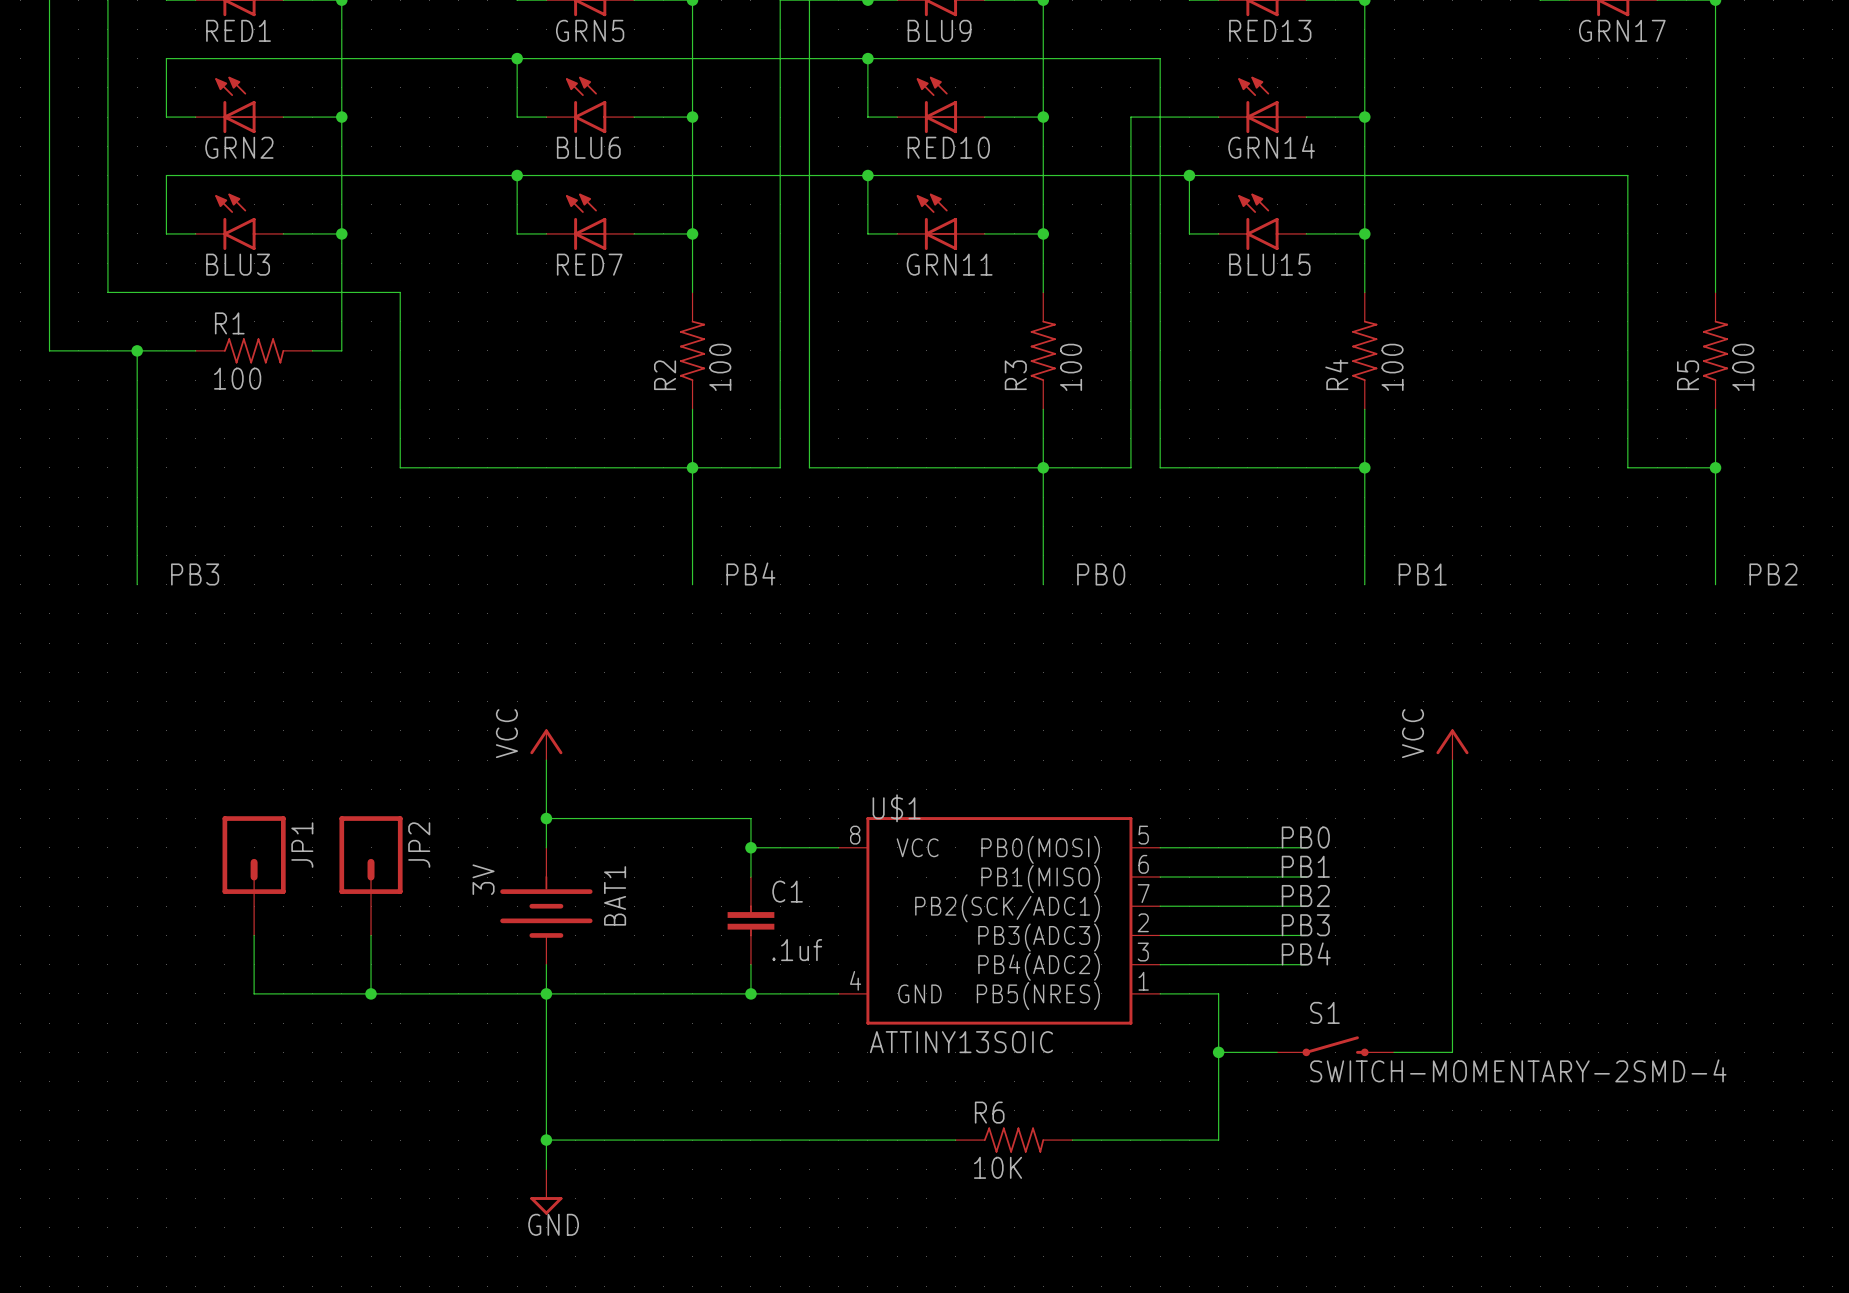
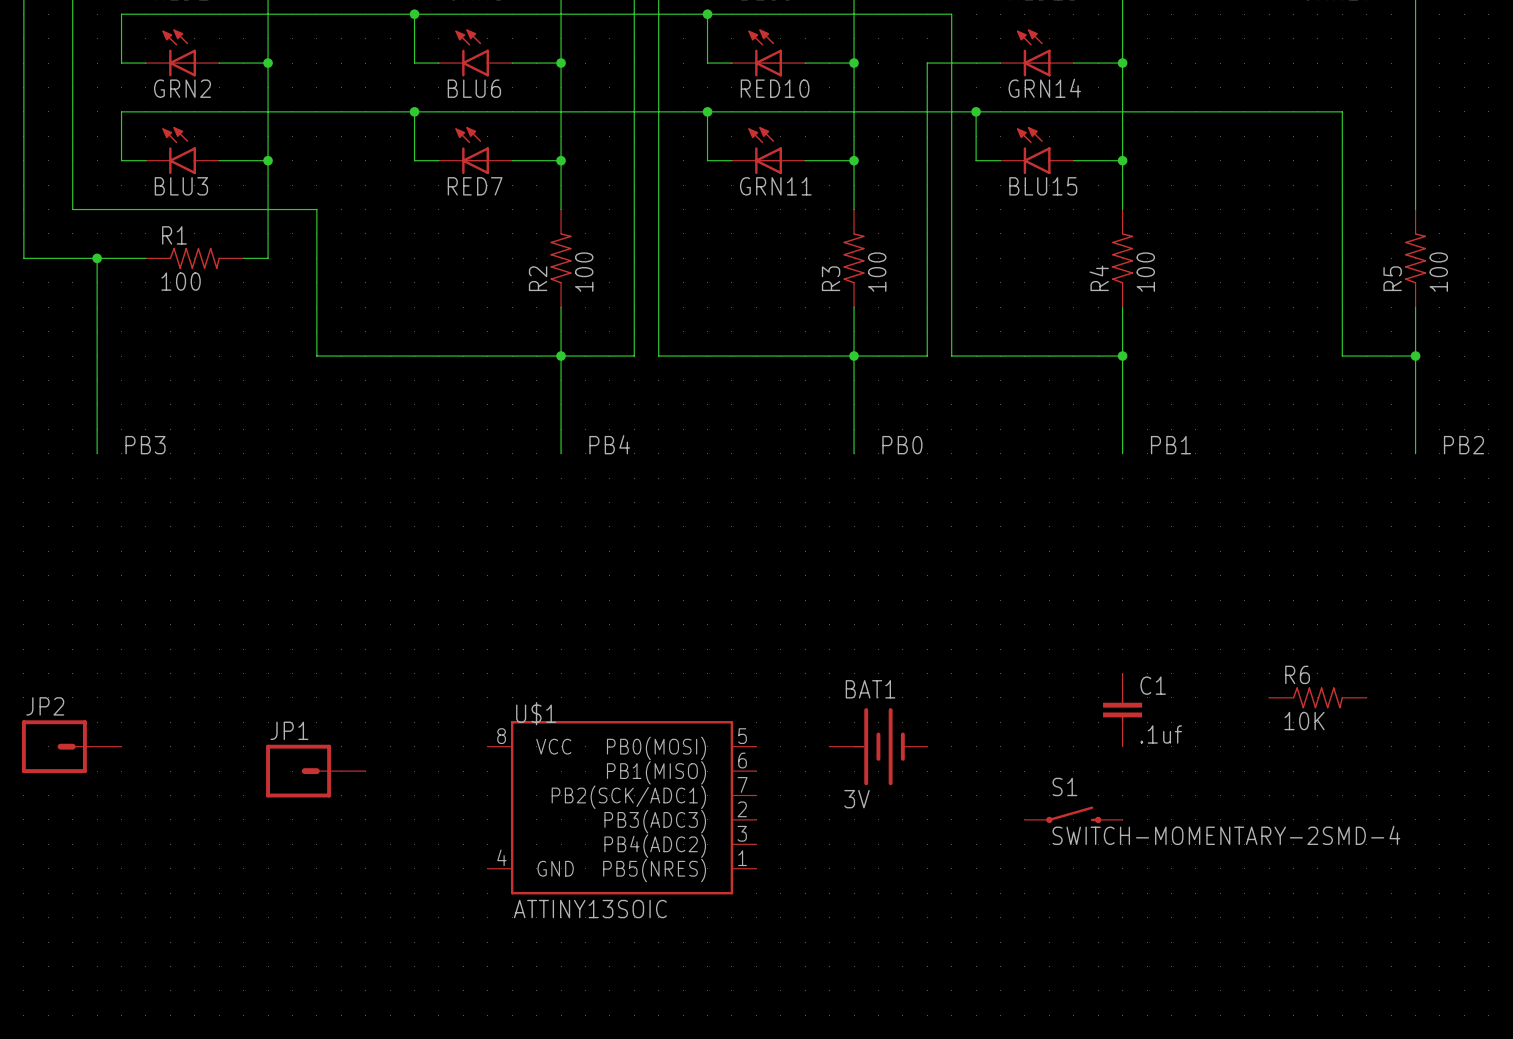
power symbol: VCC (546, 744) -> none
power symbol: VCC (1452, 744) -> none
wire: (546, 760) (546, 847) -> none
wire: (1452, 760) (1452, 1052) (1394, 1052) -> none
wire: (546, 818) (750, 818) (750, 877) -> none
junction: (546, 818) -> none
label: PB0 (1305, 837) -> none
wire: (750, 847) (838, 847) -> none
junction: (750, 847) -> none
wire: (1160, 847) (1306, 847) -> none
JP1 rotation: 0° (254, 855) -> 90° counterclockwise (298, 771)
JP2 rotation: 0° (371, 855) -> 90° counterclockwise (54, 746)
label: PB1 (1305, 866) -> none
JP1 position: (254, 875) -> (315, 771)
JP2 position: (371, 875) -> (71, 746)
wire: (1160, 877) (1306, 877) -> none
label: PB2 (1305, 896) -> none
BAT1 rotation: 0° (546, 906) -> 90° counterclockwise (879, 746)
BAT1 position: (546, 906) -> (878, 746)
wire: (1160, 906) (1306, 906) -> none
C1 position: (750, 920) -> (1122, 710)
U$1 position: (999, 920) -> (622, 807)
label: PB3 (1305, 925) -> none
wire: (254, 935) (254, 993) (838, 993) -> none
wire: (371, 935) (371, 993) -> none
wire: (1160, 935) (1306, 935) -> none
label: PB4 (1306, 953) -> none
wire: (546, 964) (546, 1169) -> none
wire: (750, 964) (750, 993) -> none
wire: (1160, 964) (1306, 964) -> none
junction: (371, 993) -> none
junction: (546, 993) -> none
junction: (750, 993) -> none
wire: (1160, 993) (1218, 993) (1218, 1140) (1072, 1140) -> none
S1 position: (1335, 1046) -> (1073, 814)
wire: (1218, 1052) (1277, 1052) -> none
junction: (1218, 1052) -> none
wire: (546, 1140) (955, 1140) -> none
junction: (546, 1140) -> none
R6 position: (1014, 1140) -> (1317, 697)
power symbol: GND (546, 1191) -> none

